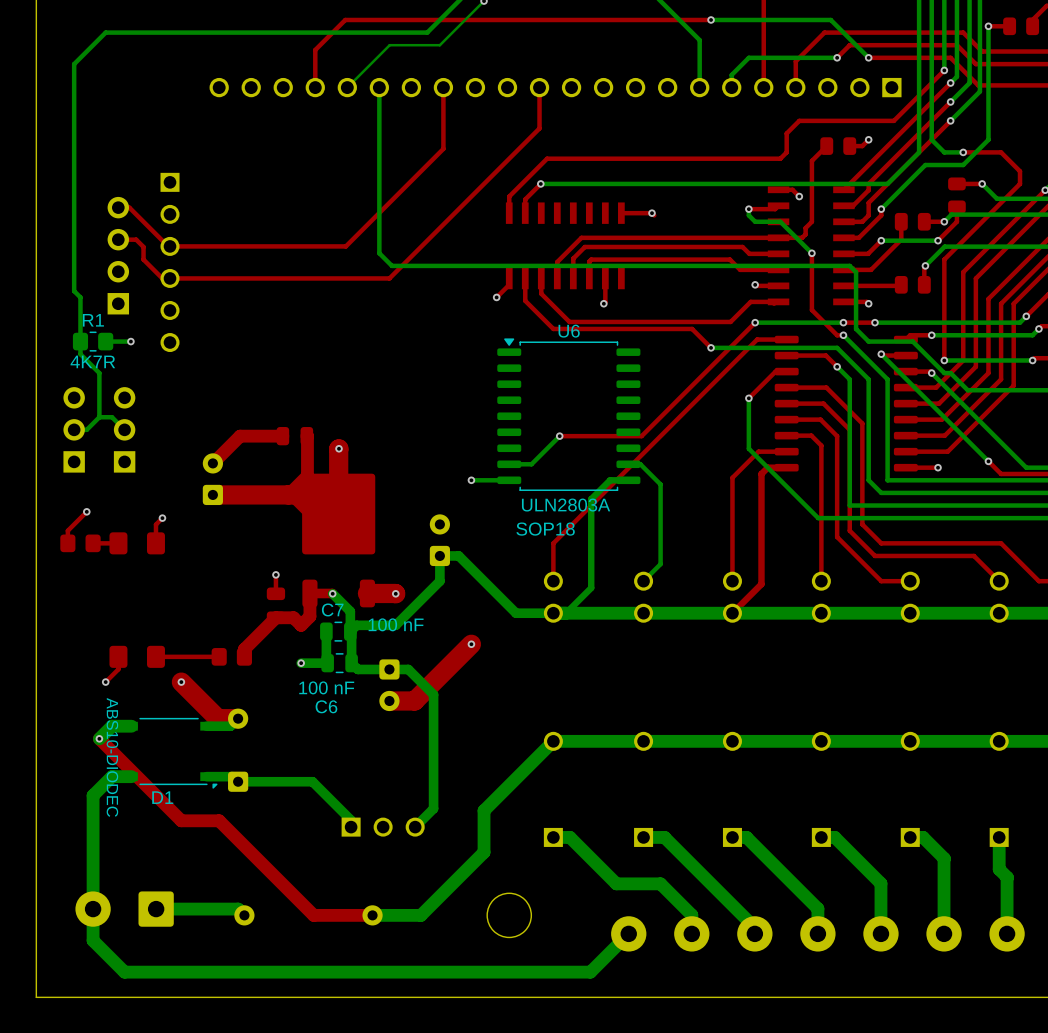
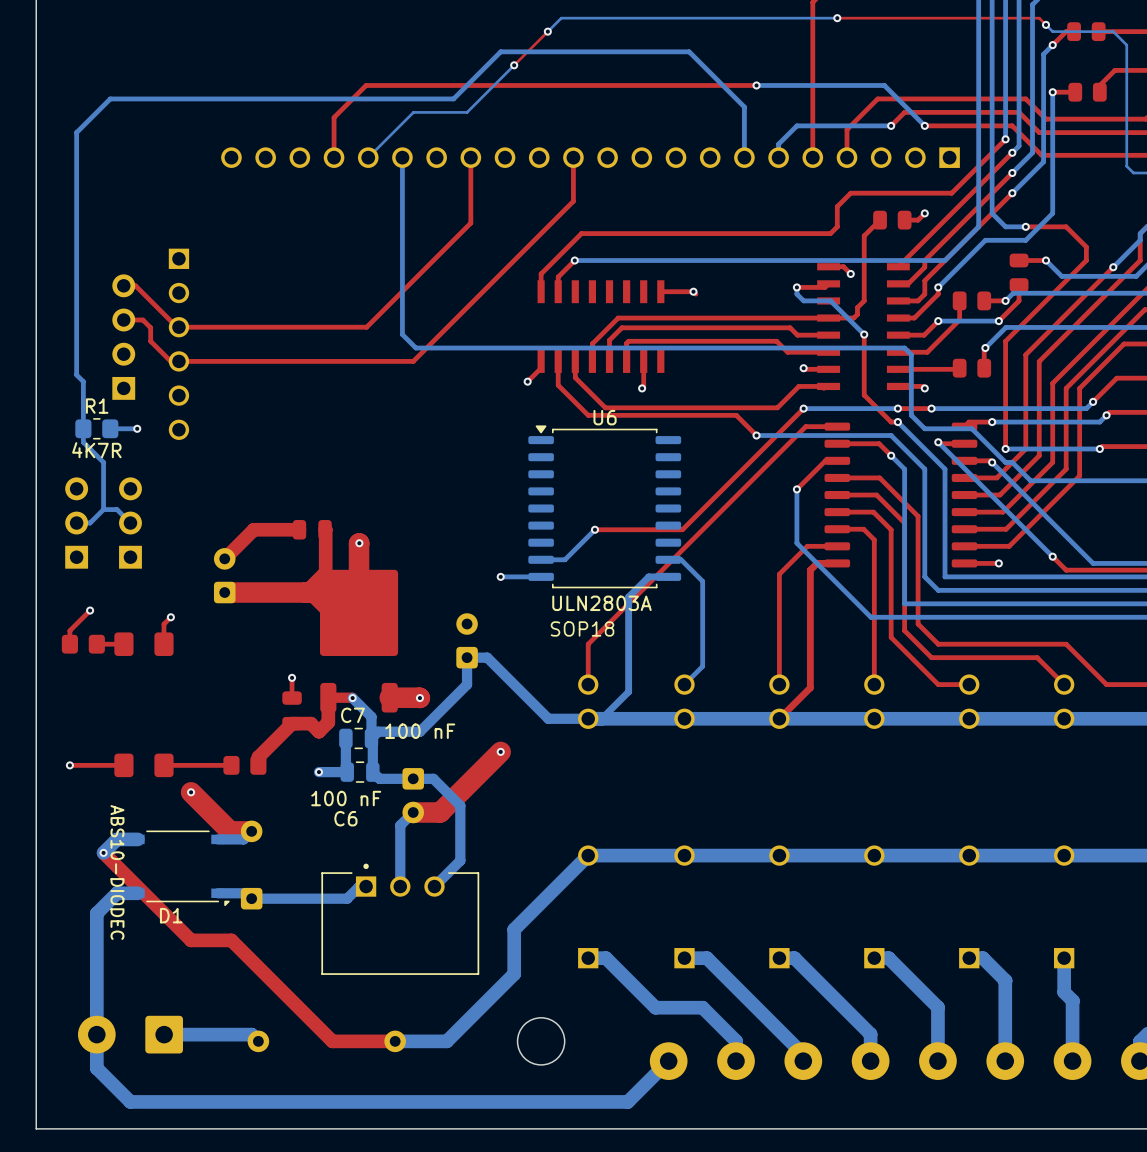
top track: (118, 656) (118, 669) (105, 682) -> (123, 765) (69, 765)
via position: (105, 682) -> (69, 765)
bottom track: none -> (413, 812) (400, 825) (400, 886)
bottom track: (433, 746) (433, 808) (415, 827) -> (460, 860) (434, 886)
bottom track: (312, 781) (351, 820) (351, 827) -> (331, 898) (347, 898) (359, 886) (366, 886)
part side: top (383, 827) -> bottom (400, 919)

